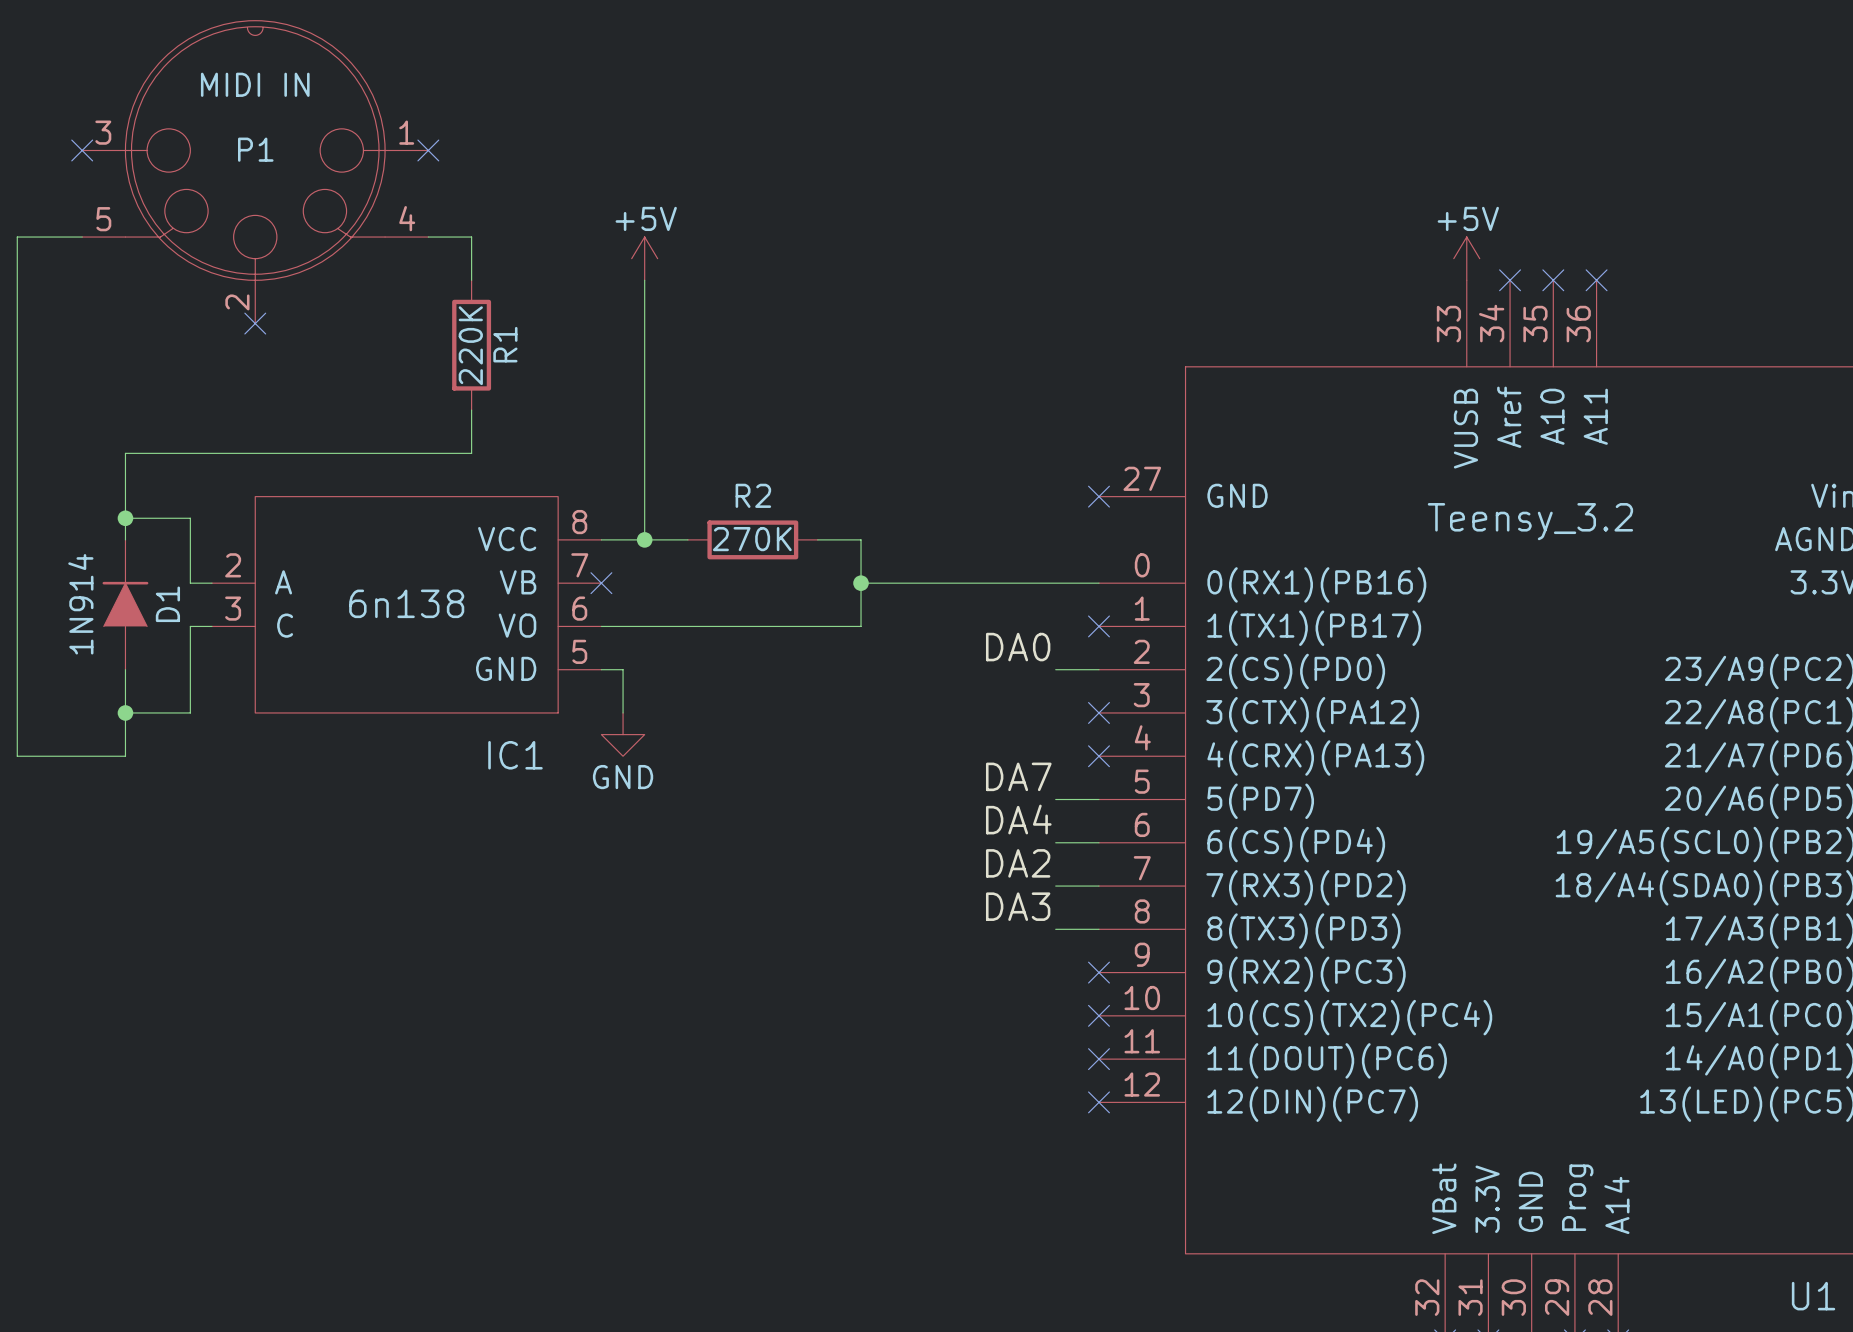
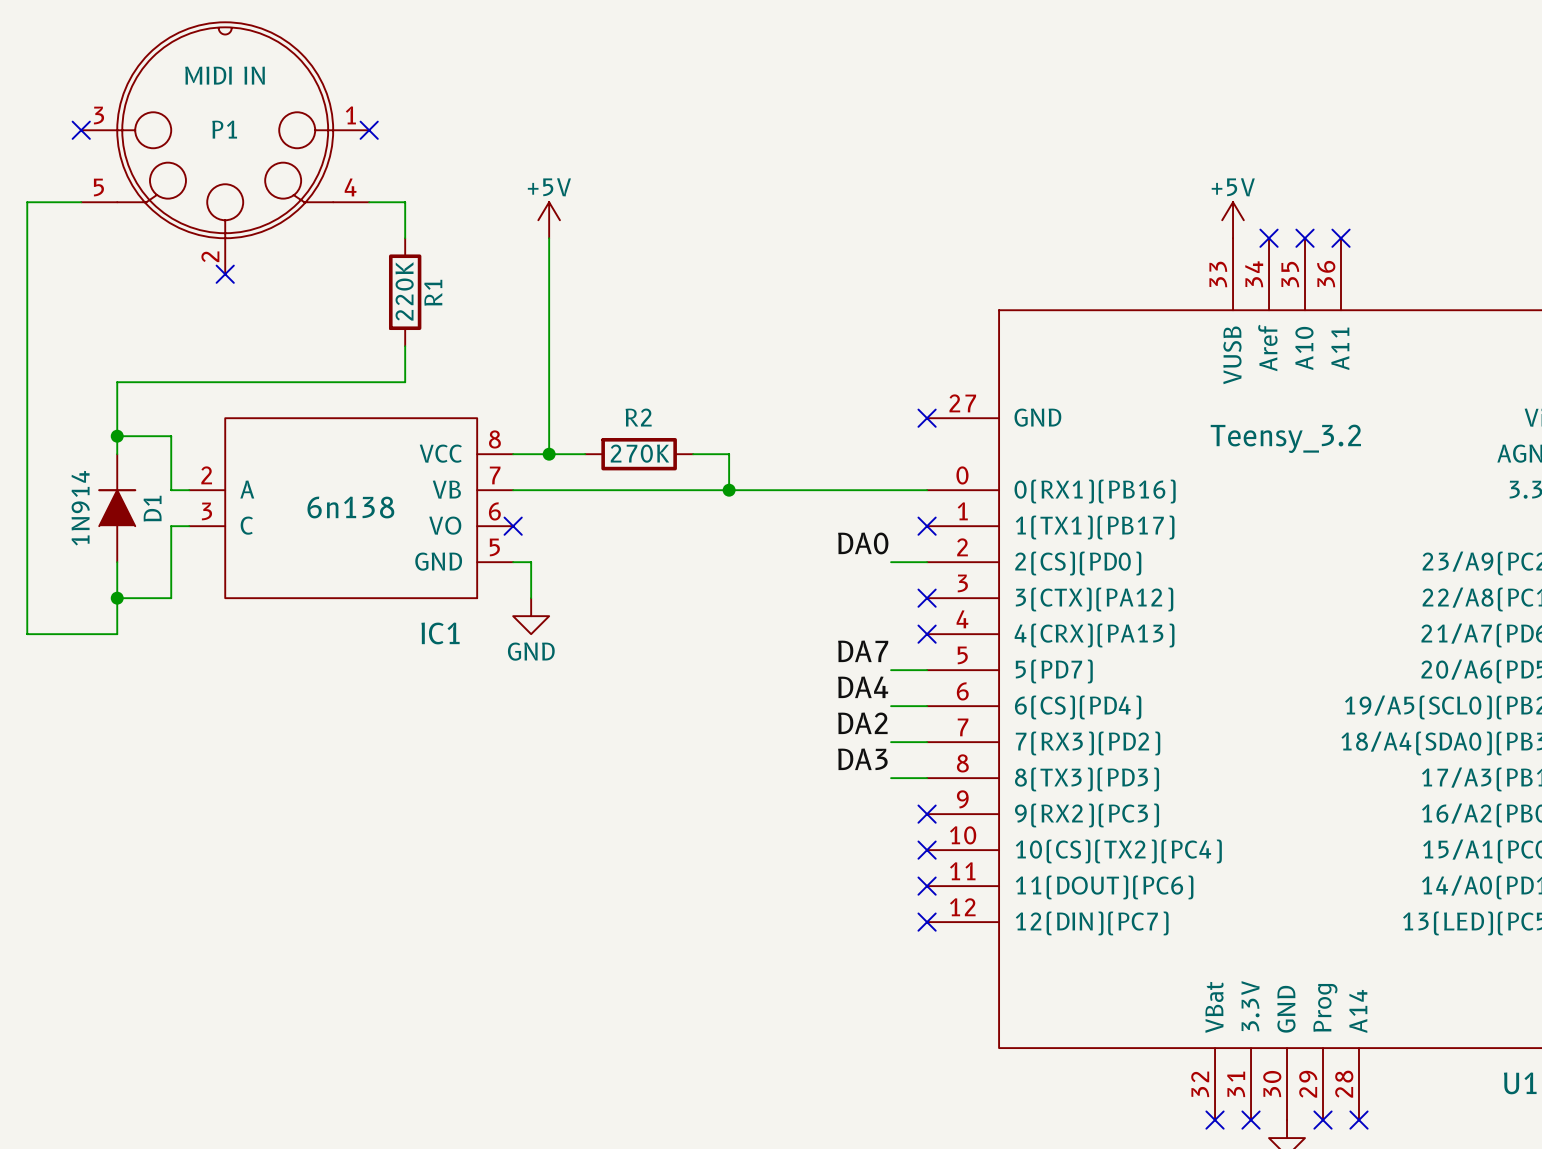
no-connect mark position: (601, 583) -> (513, 526)
wire: (861, 583) (861, 626) (601, 626) -> (729, 490) (513, 490)

